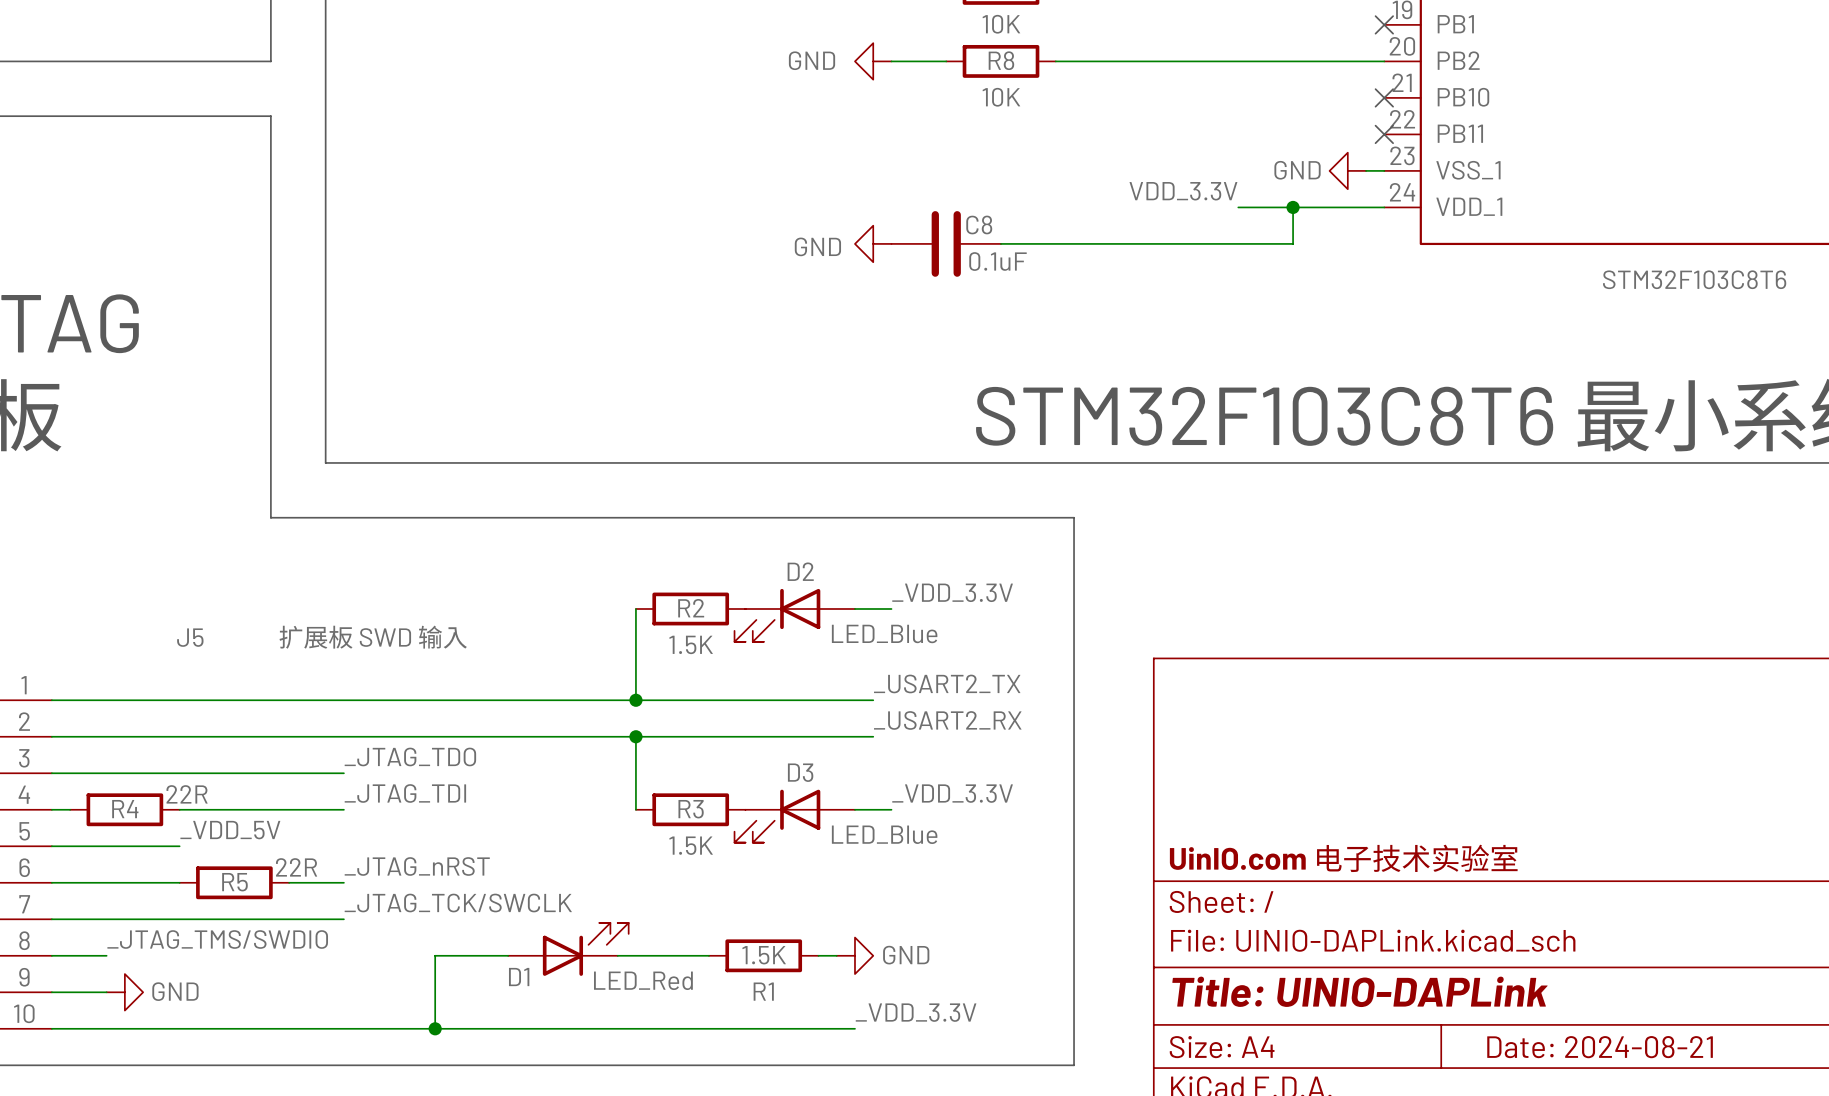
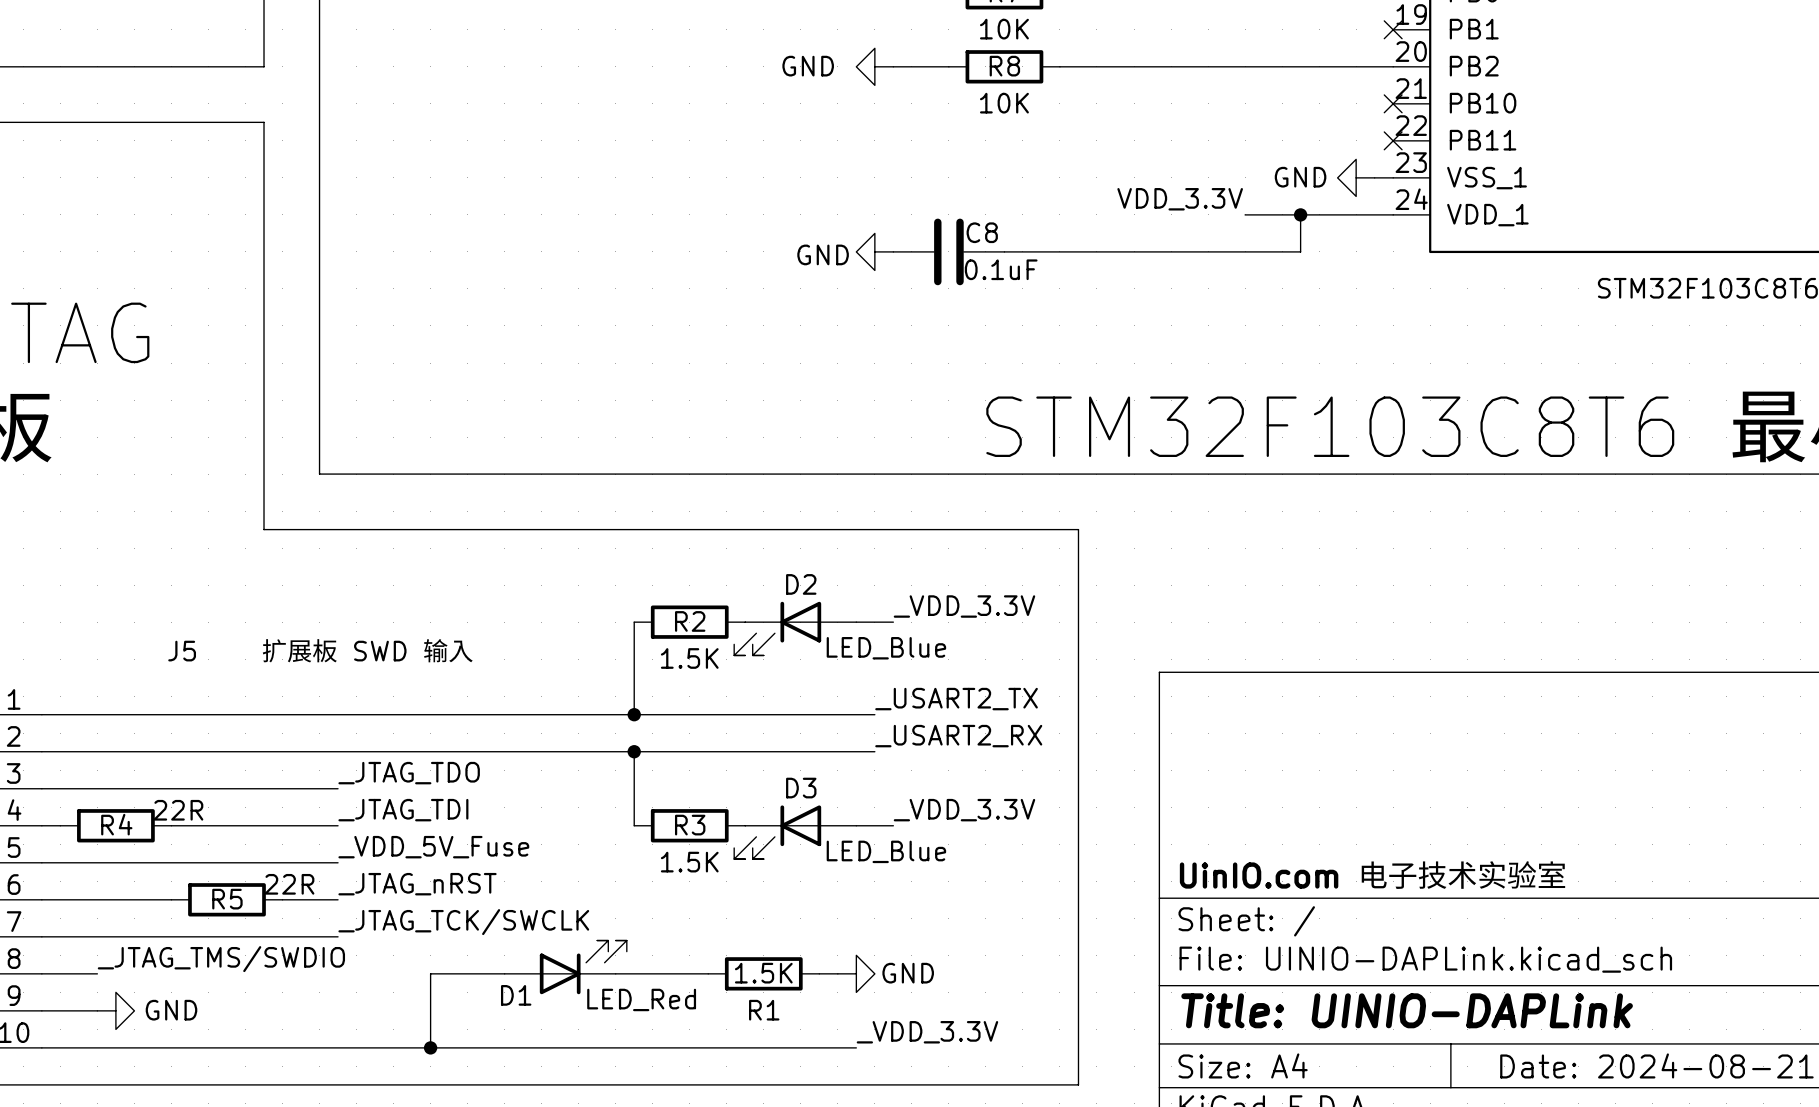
label: _VDD_5V (230, 830) -> none
label: none -> _VDD_5V_Fuse (433, 847)
wire: none -> (171, 862) (338, 862)

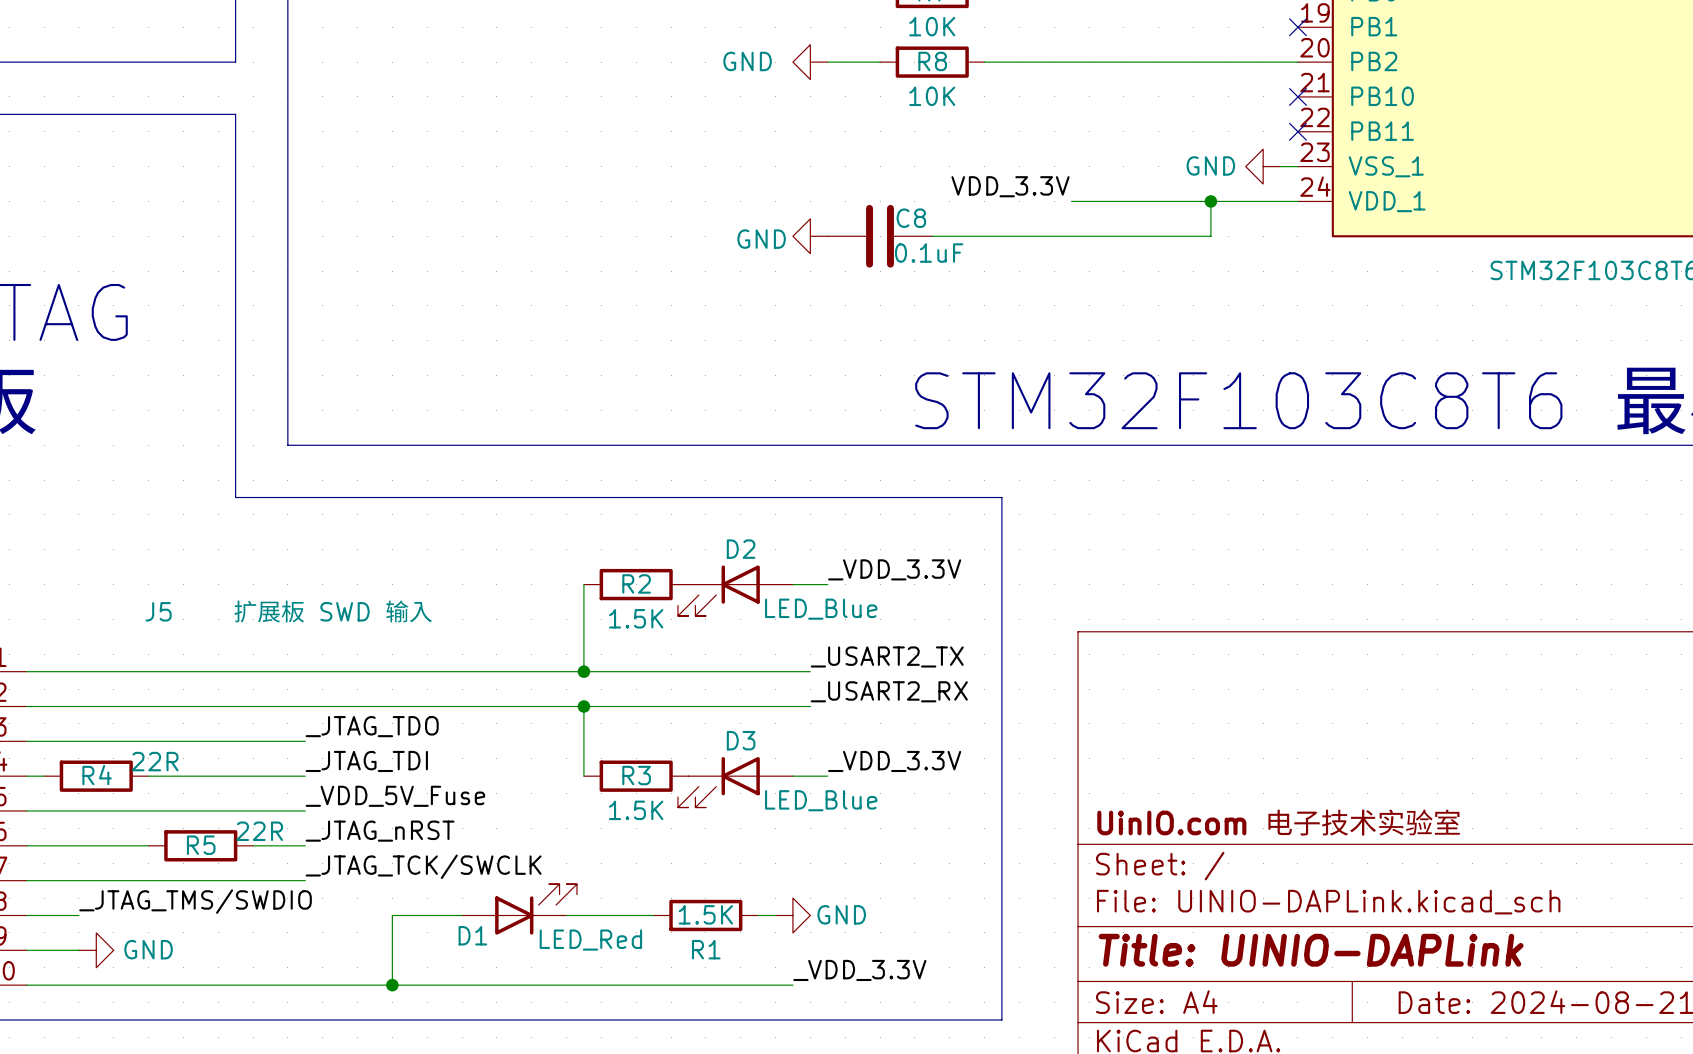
label position: VDD_3.3V (1180, 199) -> VDD_3.3V (1010, 186)
wire: none -> (1071, 201) (1158, 201)

